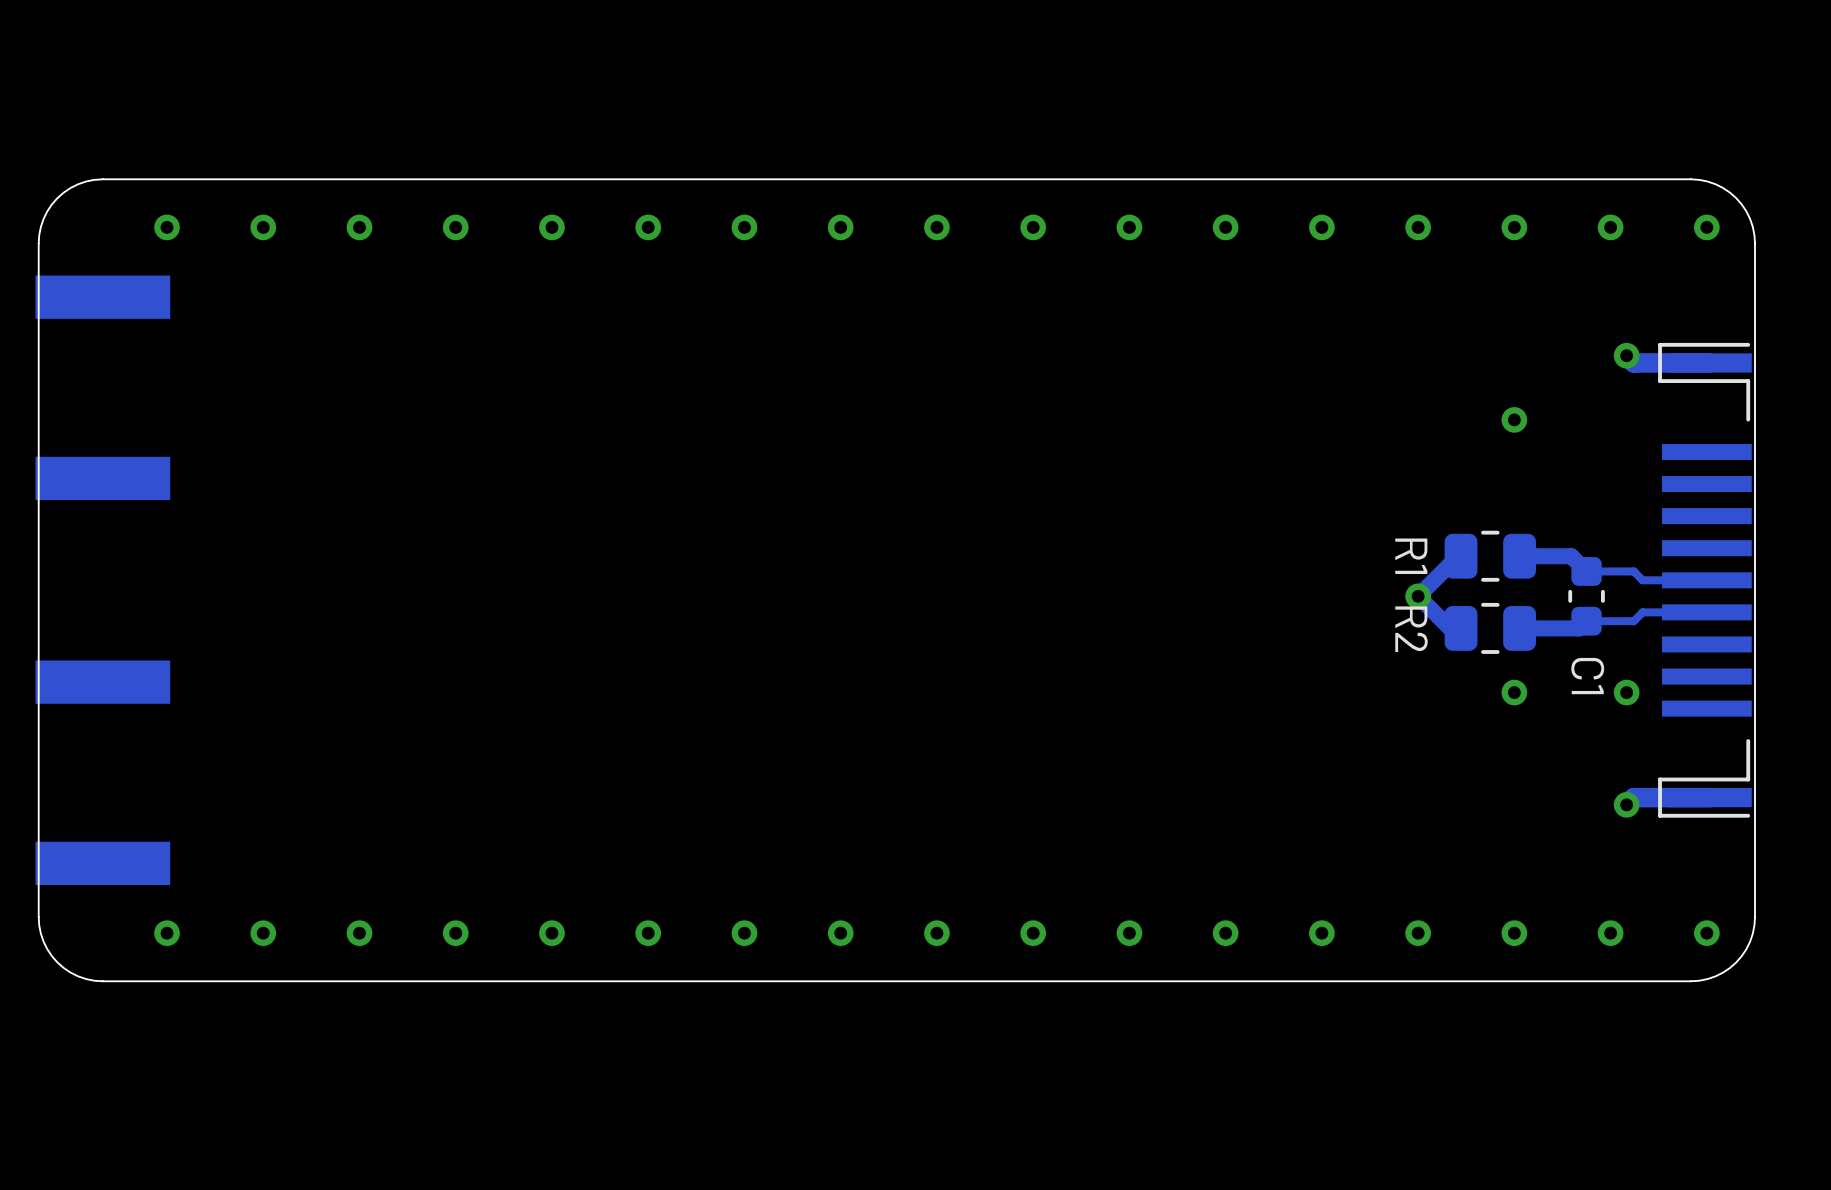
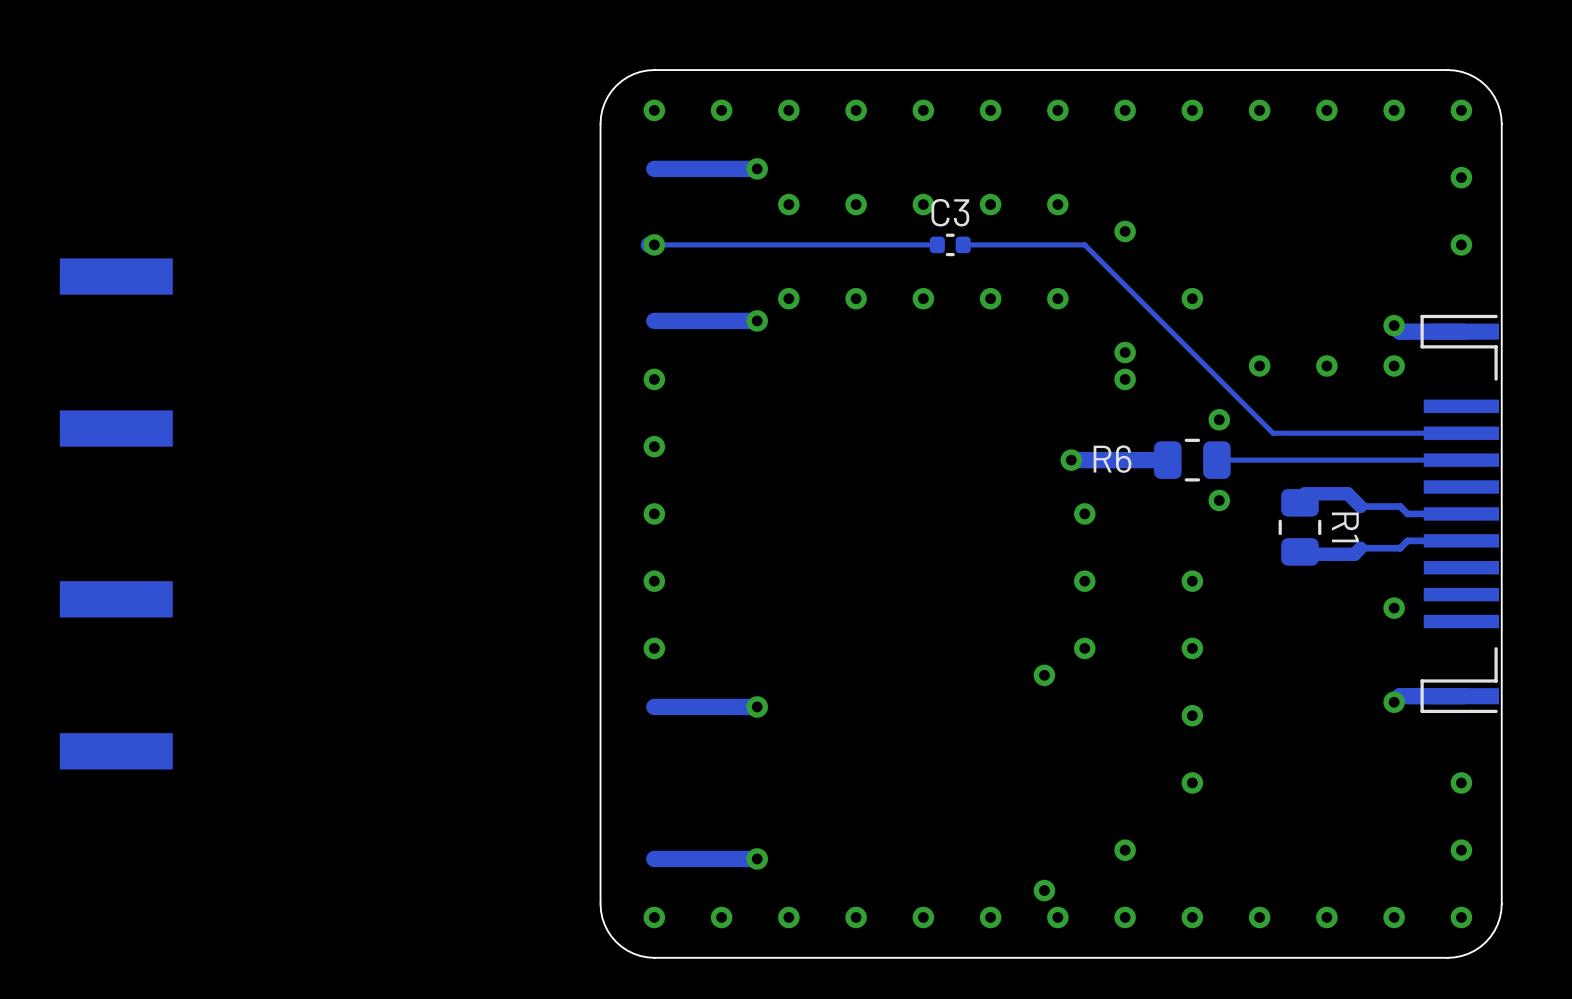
via: none -> (654, 110)
via: none -> (721, 110)
via: none -> (788, 110)
via: none -> (856, 110)
via: none -> (923, 110)
via: none -> (990, 110)
via: none -> (1057, 110)
via: none -> (1125, 110)
via: none -> (1192, 110)
via: none -> (1259, 110)
via: none -> (1326, 110)
via: none -> (1394, 110)
via: none -> (1461, 110)
track: none -> (757, 168) (654, 168)
via: none -> (757, 168)
via: none -> (1461, 177)
via: none -> (788, 204)
via: none -> (856, 204)
via: none -> (923, 204)
via: (167, 227) -> none
via: (263, 227) -> none
via: (359, 227) -> none
via: (455, 227) -> none
via: (551, 227) -> none
via: (648, 227) -> none
via position: (744, 227) -> (654, 244)
via: (840, 227) -> none
via: (936, 227) -> none
via: (1033, 227) -> none
via position: (1129, 227) -> (990, 204)
via position: (1225, 227) -> (1057, 204)
via position: (1321, 227) -> (1125, 231)
via: (1418, 227) -> none
via: (1514, 227) -> none
via: (1610, 227) -> none
via: (1706, 227) -> none
board edge: (1754, 243) (1750, 218) (1736, 198) (1715, 184) (1690, 179) (102, 179) (78, 184) (57, 198) (43, 218) (38, 243) (38, 917) (43, 941) (51, 956) (63, 968) (78, 976) (102, 981) (1690, 981) (1715, 976) (1736, 962) (1750, 941) (1754, 917) -> (1501, 231) (1501, 123) (1499, 109) (1494, 96) (1480, 81) (1468, 74) (1454, 70) (654, 70) (633, 74) (616, 85) (604, 103) (600, 116) (600, 904) (604, 924) (611, 936) (621, 946) (640, 955) (654, 957) (1454, 957) (1468, 953) (1480, 946) (1494, 930) (1499, 917) (1501, 904) (1501, 796)
track: none -> (937, 244) (648, 244) (654, 244)
C3: none -> (950, 244)
track: none -> (963, 244) (1084, 244) (1273, 433) (1461, 433)
via: none -> (1461, 244)
via: none -> (788, 298)
via: none -> (856, 298)
via: none -> (923, 298)
via: none -> (990, 298)
via: none -> (1057, 298)
via: none -> (1192, 298)
track: none -> (757, 320) (654, 320)
via: none -> (757, 320)
via: none -> (1125, 352)
via: none -> (1259, 365)
via: none -> (1326, 365)
via: none -> (1394, 365)
via: none -> (654, 379)
via: none -> (1125, 379)
via: (1514, 419) -> none
via: none -> (1219, 419)
via: none -> (654, 446)
via: none -> (1071, 460)
track: none -> (1167, 460) (1071, 460)
R6: none -> (1192, 460)
track: none -> (1461, 460) (1216, 460)
R1 name position: R1 (1411, 556) -> R1 (1345, 527)
track: (1461, 556) (1458, 556) (1418, 596) (1450, 628) (1461, 628) -> none
R1 rotation: 0° (1490, 556) -> 90° clockwise (1299, 527)
via: none -> (654, 513)
via: none -> (1084, 513)
via position: (1418, 596) -> (1219, 500)
C1: (1586, 596) -> none
R2: (1490, 628) -> none
via: none -> (654, 581)
via: none -> (1084, 581)
via: none -> (1192, 581)
via: (1514, 692) -> none
via: none -> (654, 648)
via: none -> (1084, 648)
via: none -> (1192, 648)
via: none -> (1044, 675)
track: none -> (757, 706) (654, 706)
via: none -> (757, 706)
via: none -> (1192, 715)
via: none -> (1192, 782)
via: none -> (1461, 782)
via: (167, 933) -> none
via: (263, 933) -> none
via: (359, 933) -> none
via: (455, 933) -> none
via: (551, 933) -> none
via: (648, 933) -> none
via: (744, 933) -> none
via: (840, 933) -> none
via: (936, 933) -> none
via: (1033, 933) -> none
via: (1129, 933) -> none
via: (1225, 933) -> none
via: (1321, 933) -> none
via: (1418, 933) -> none
via: (1514, 933) -> none
via: (1610, 933) -> none
via: (1706, 933) -> none
via: none -> (1125, 850)
via: none -> (1461, 850)
track: none -> (757, 858) (654, 858)
via: none -> (757, 858)
via: none -> (1044, 890)
via: none -> (654, 917)
via: none -> (721, 917)
via: none -> (788, 917)
via: none -> (856, 917)
via: none -> (923, 917)
via: none -> (990, 917)
via: none -> (1057, 917)
via: none -> (1125, 917)
via: none -> (1192, 917)
via: none -> (1259, 917)
via: none -> (1326, 917)
via: none -> (1394, 917)
via: none -> (1461, 917)

